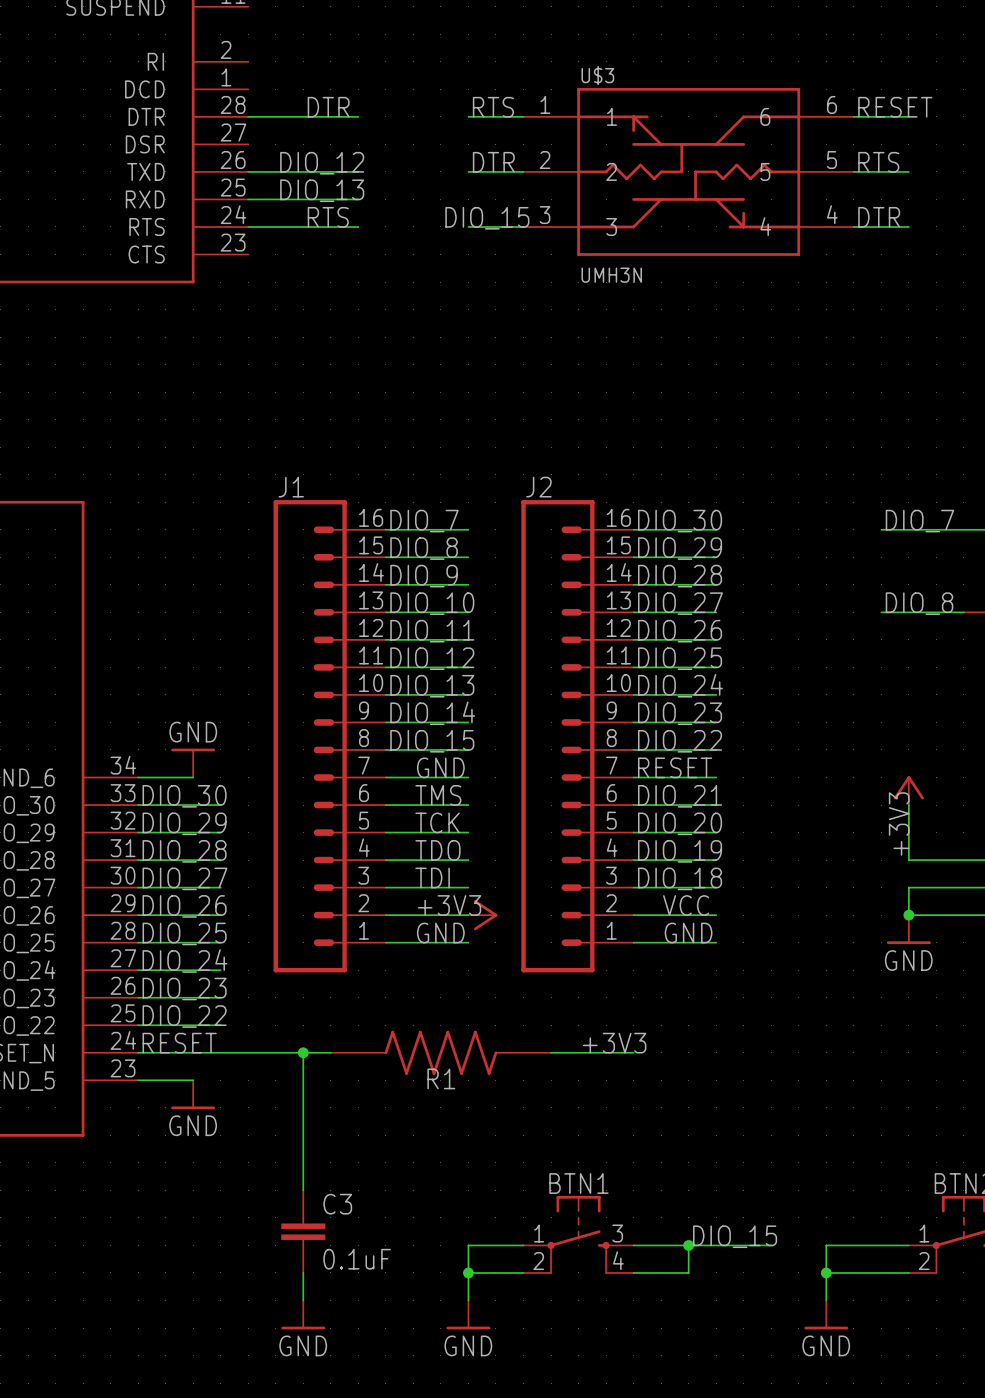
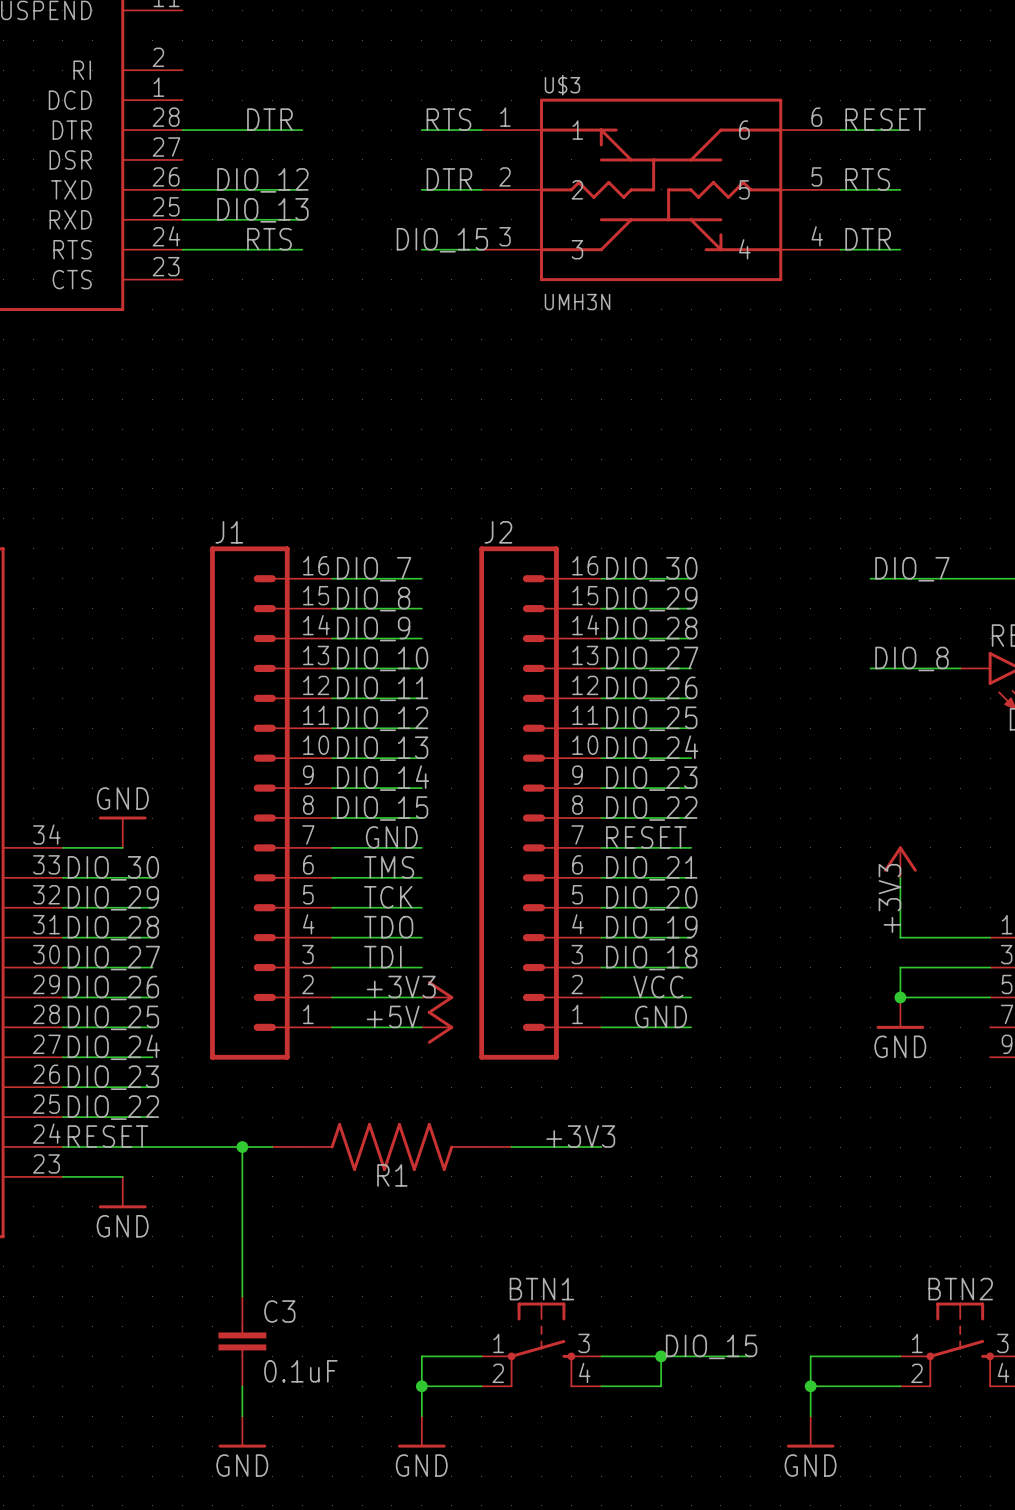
label: GND (440, 933) -> none
power symbol: none -> +5V (437, 1027)

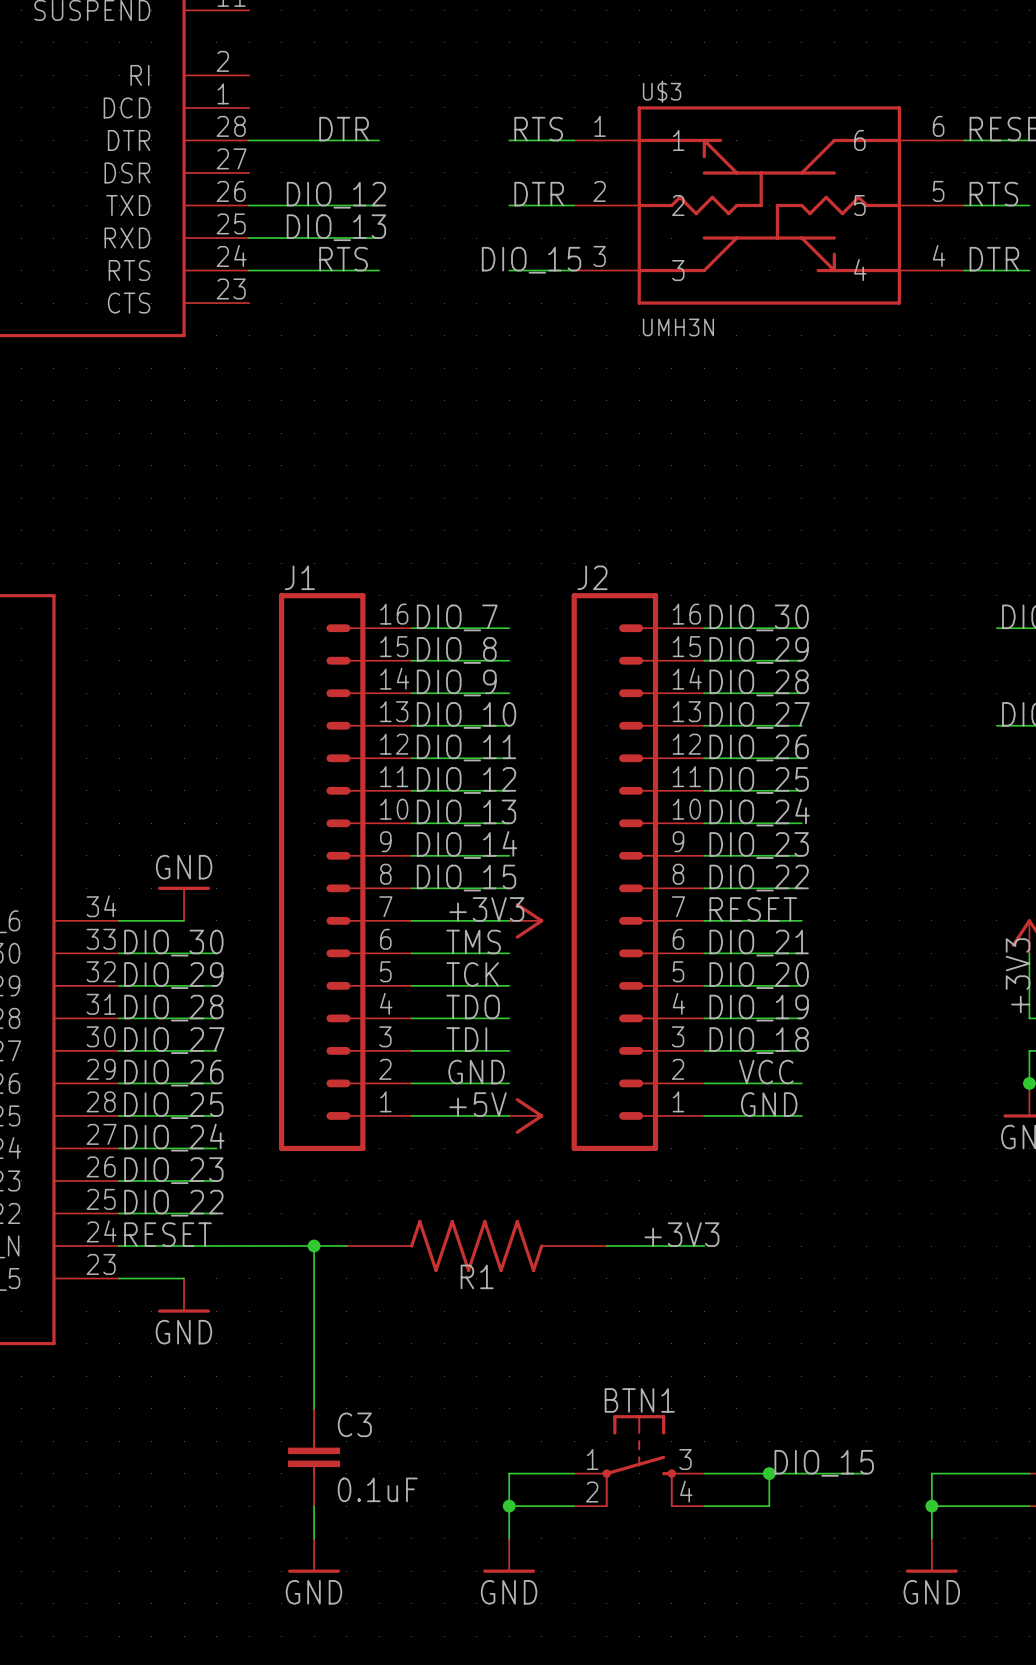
label position: GND (391, 837) -> GND (476, 1072)
power symbol position: +3V3 (437, 997) -> +3V3 (526, 920)

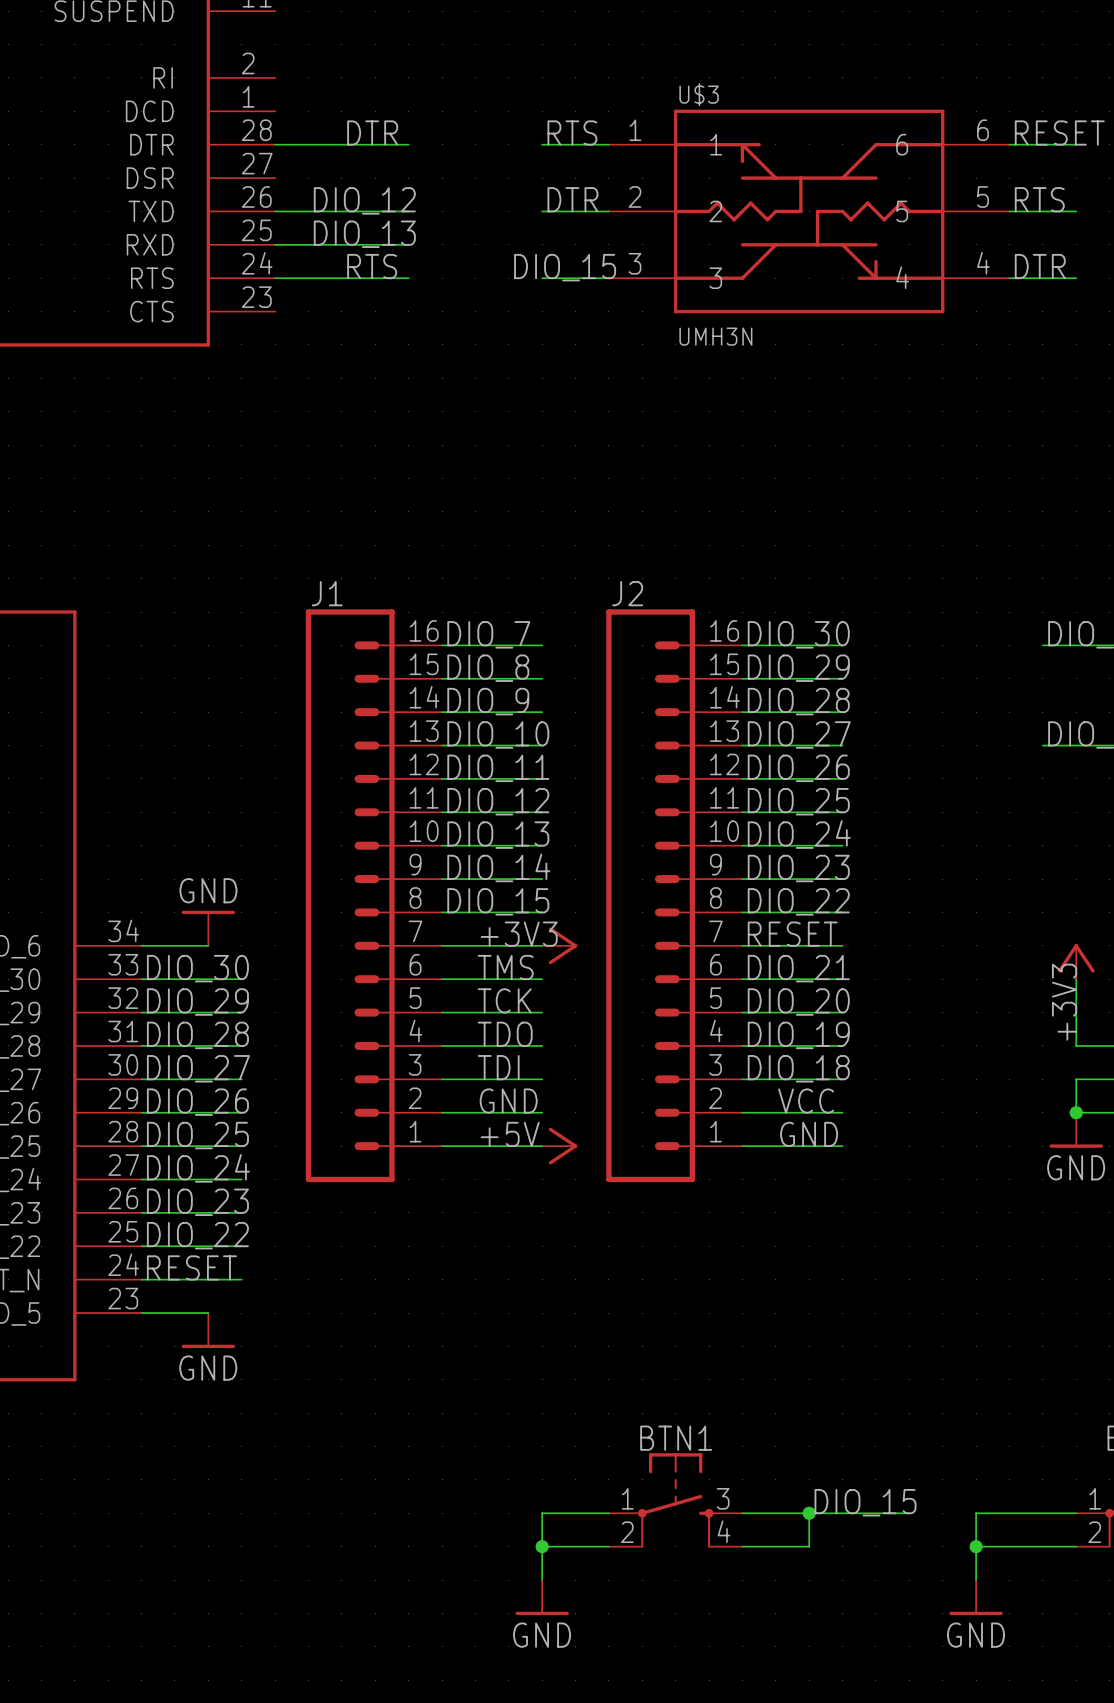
label: +3V3 (681, 1234) -> none
wire: (216, 1246) (346, 1246) -> none
wire: (314, 1246) (314, 1408) -> none
junction: (314, 1246) -> none
R1: (476, 1246) -> none
wire: (606, 1246) (704, 1246) -> none
C3: 0.1uF (314, 1457) -> none
wire: (314, 1506) (314, 1538) -> none
power symbol: GND (314, 1555) -> none

